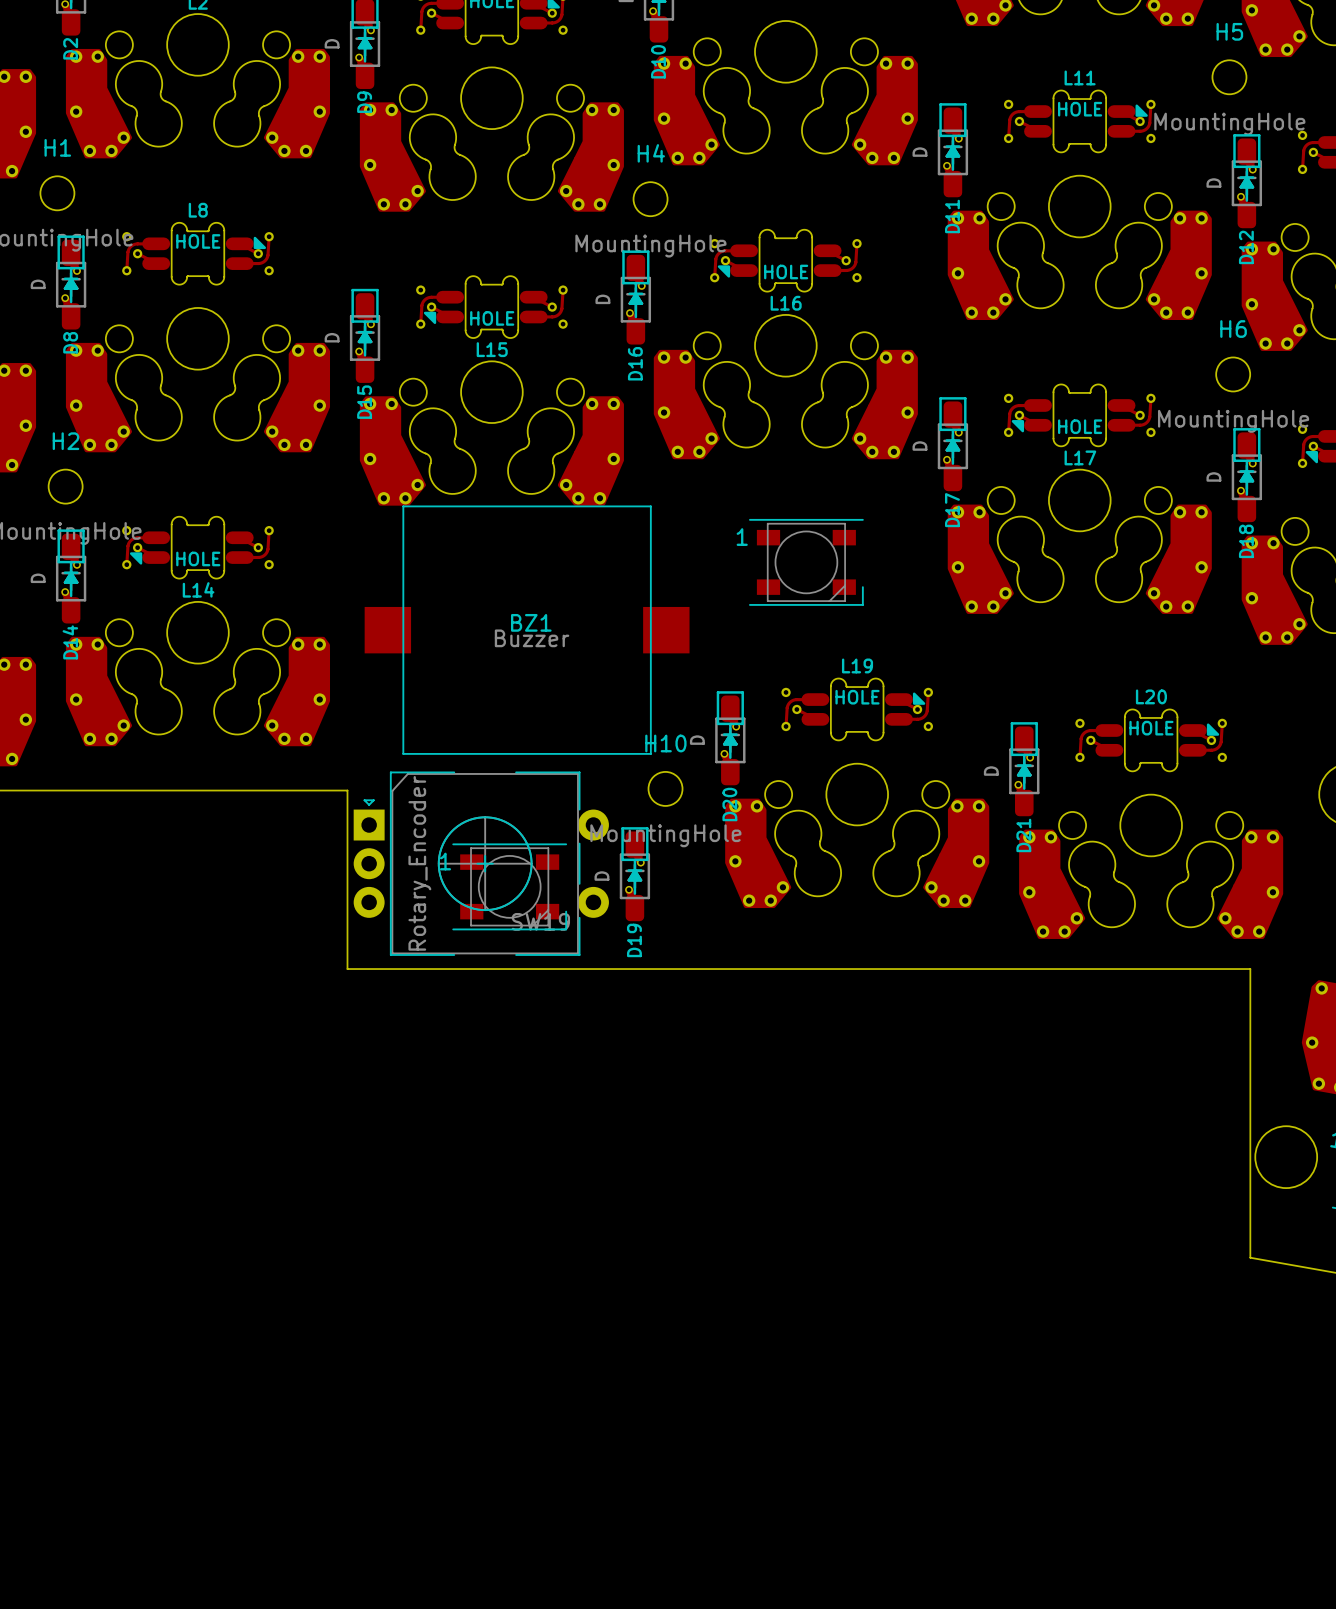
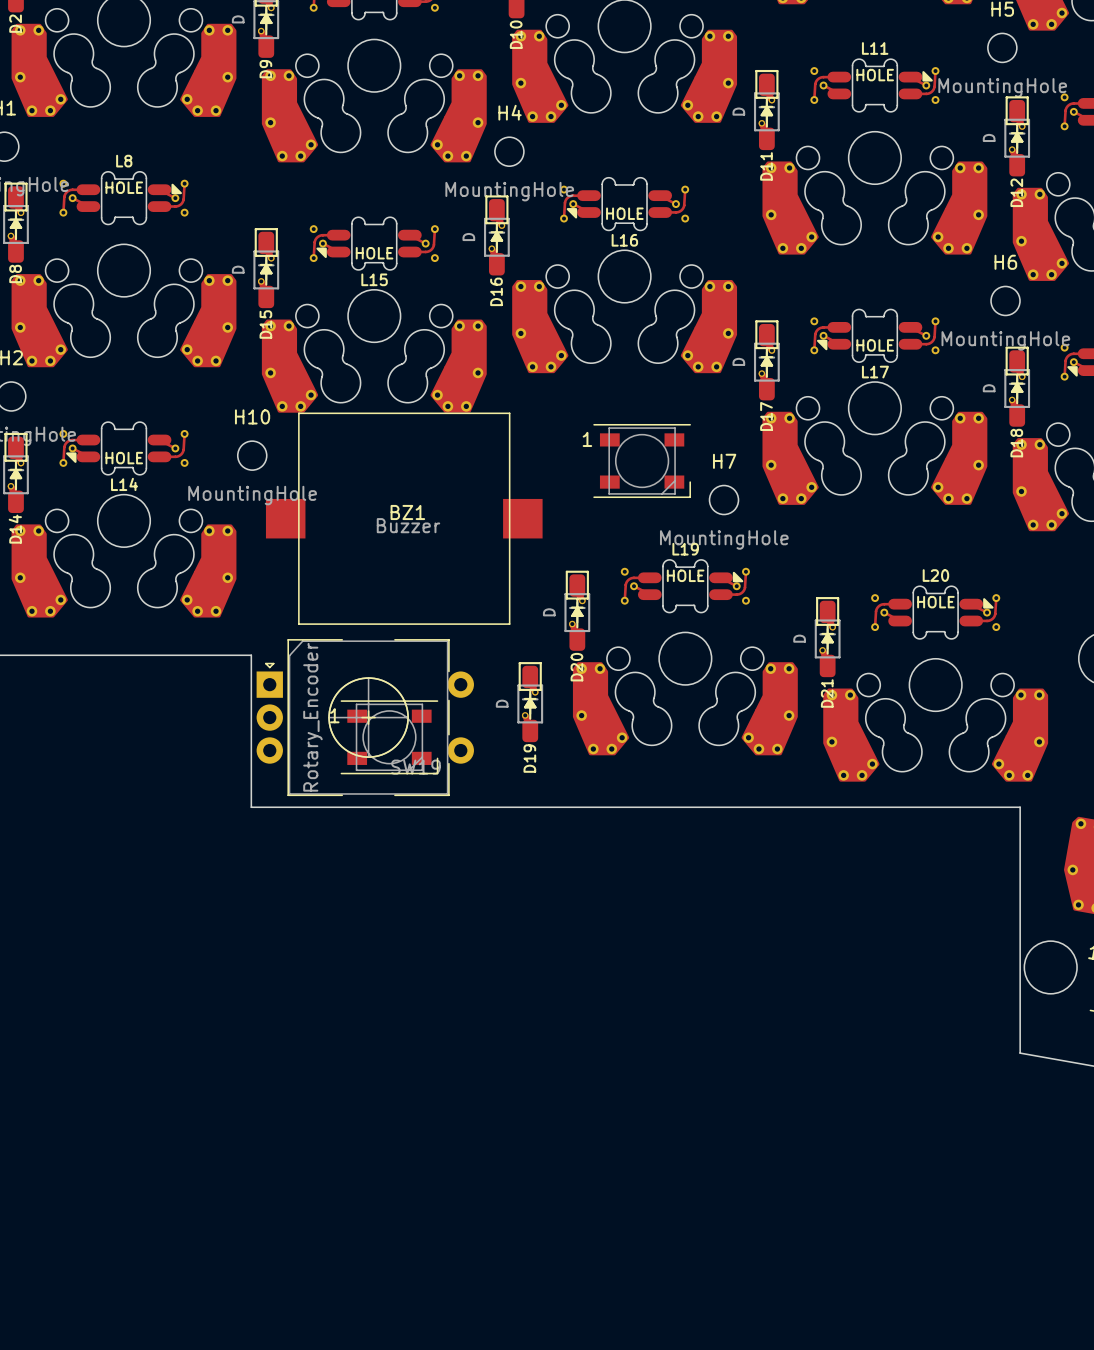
H7: none -> MountingHole (724, 500)
H10 position: (665, 788) -> (252, 455)
D19 footprint: [619, 827, 651, 922] -> [517, 662, 544, 743]

